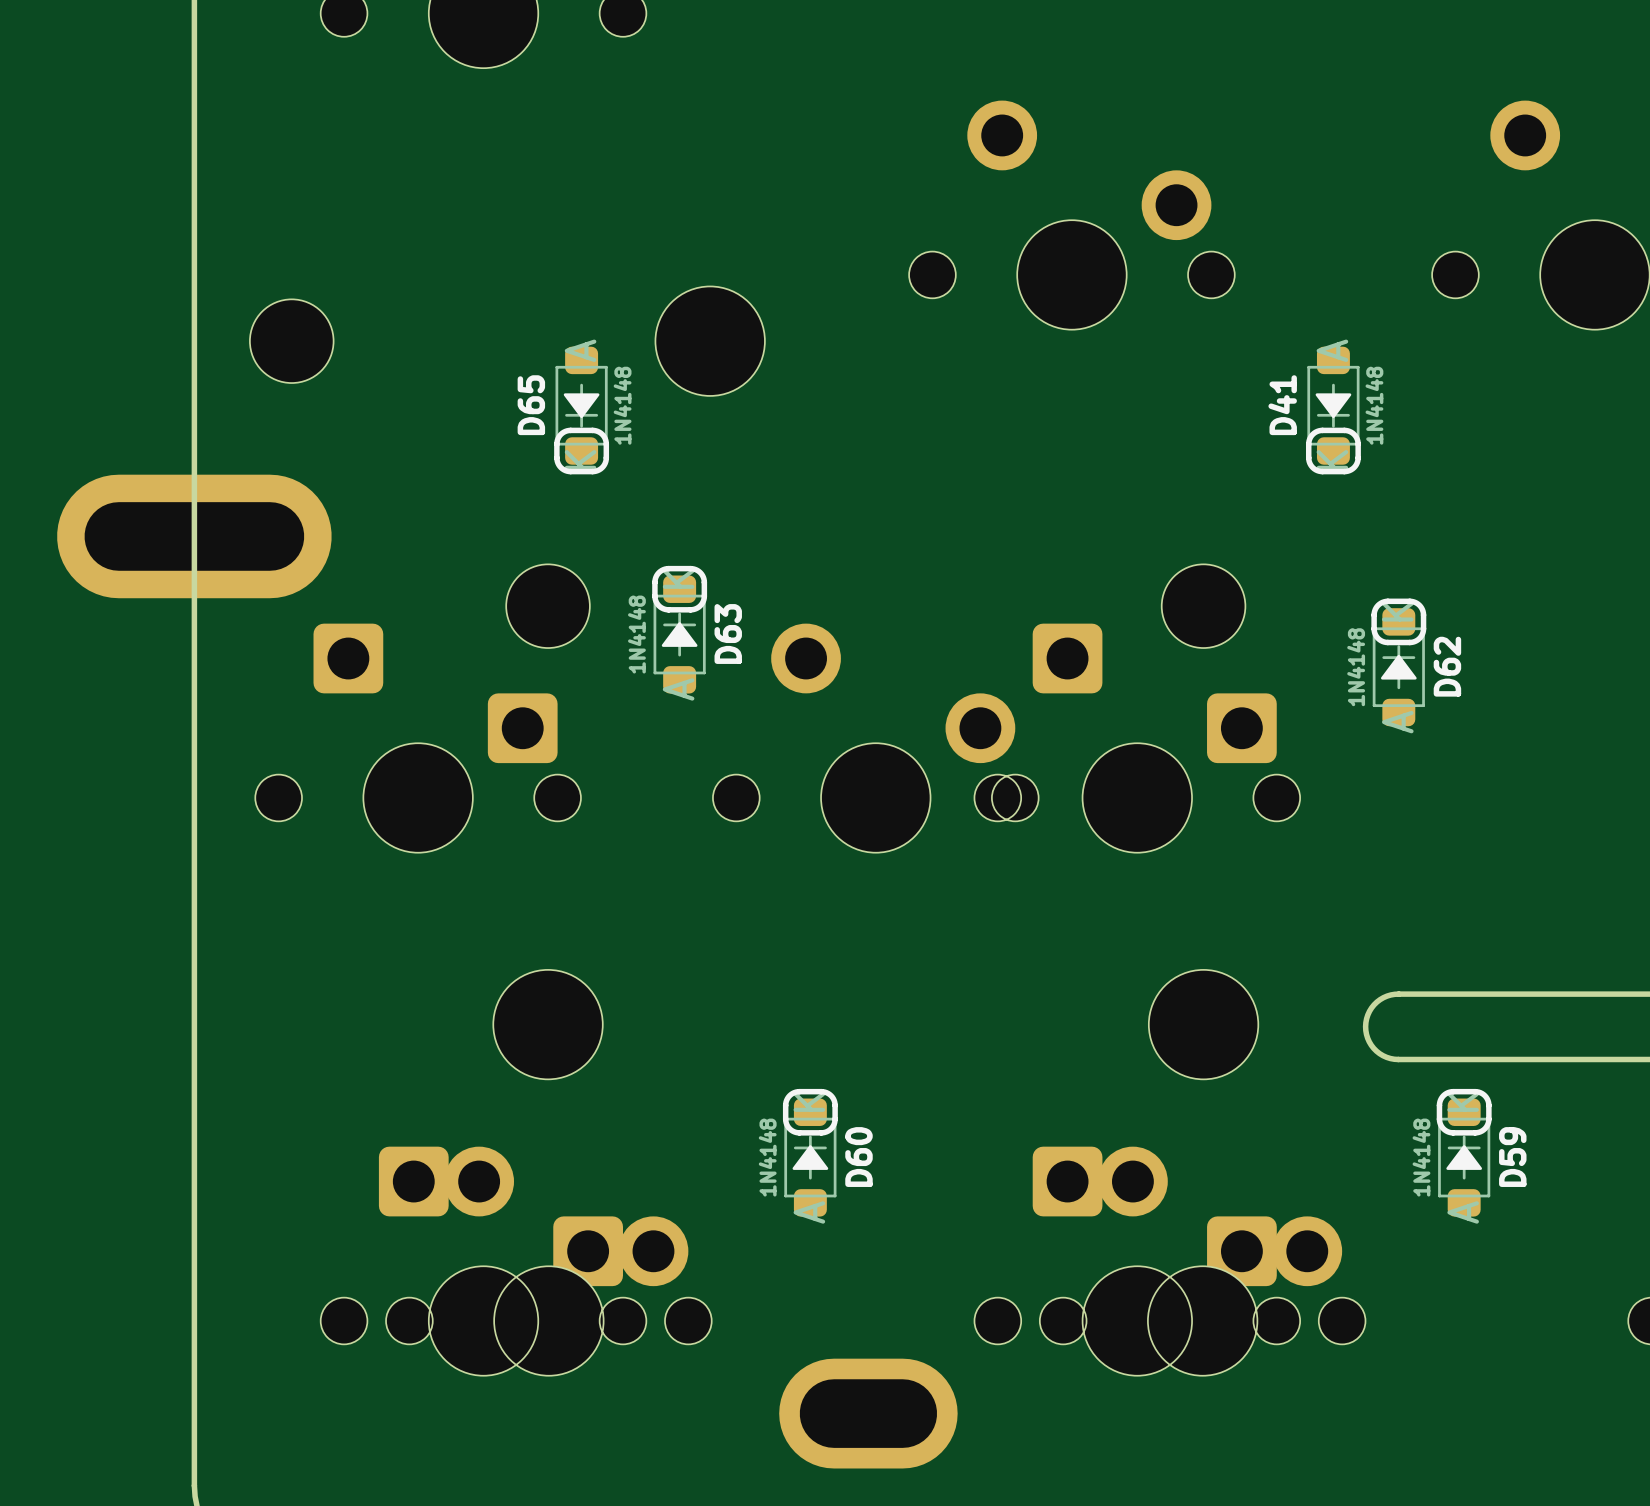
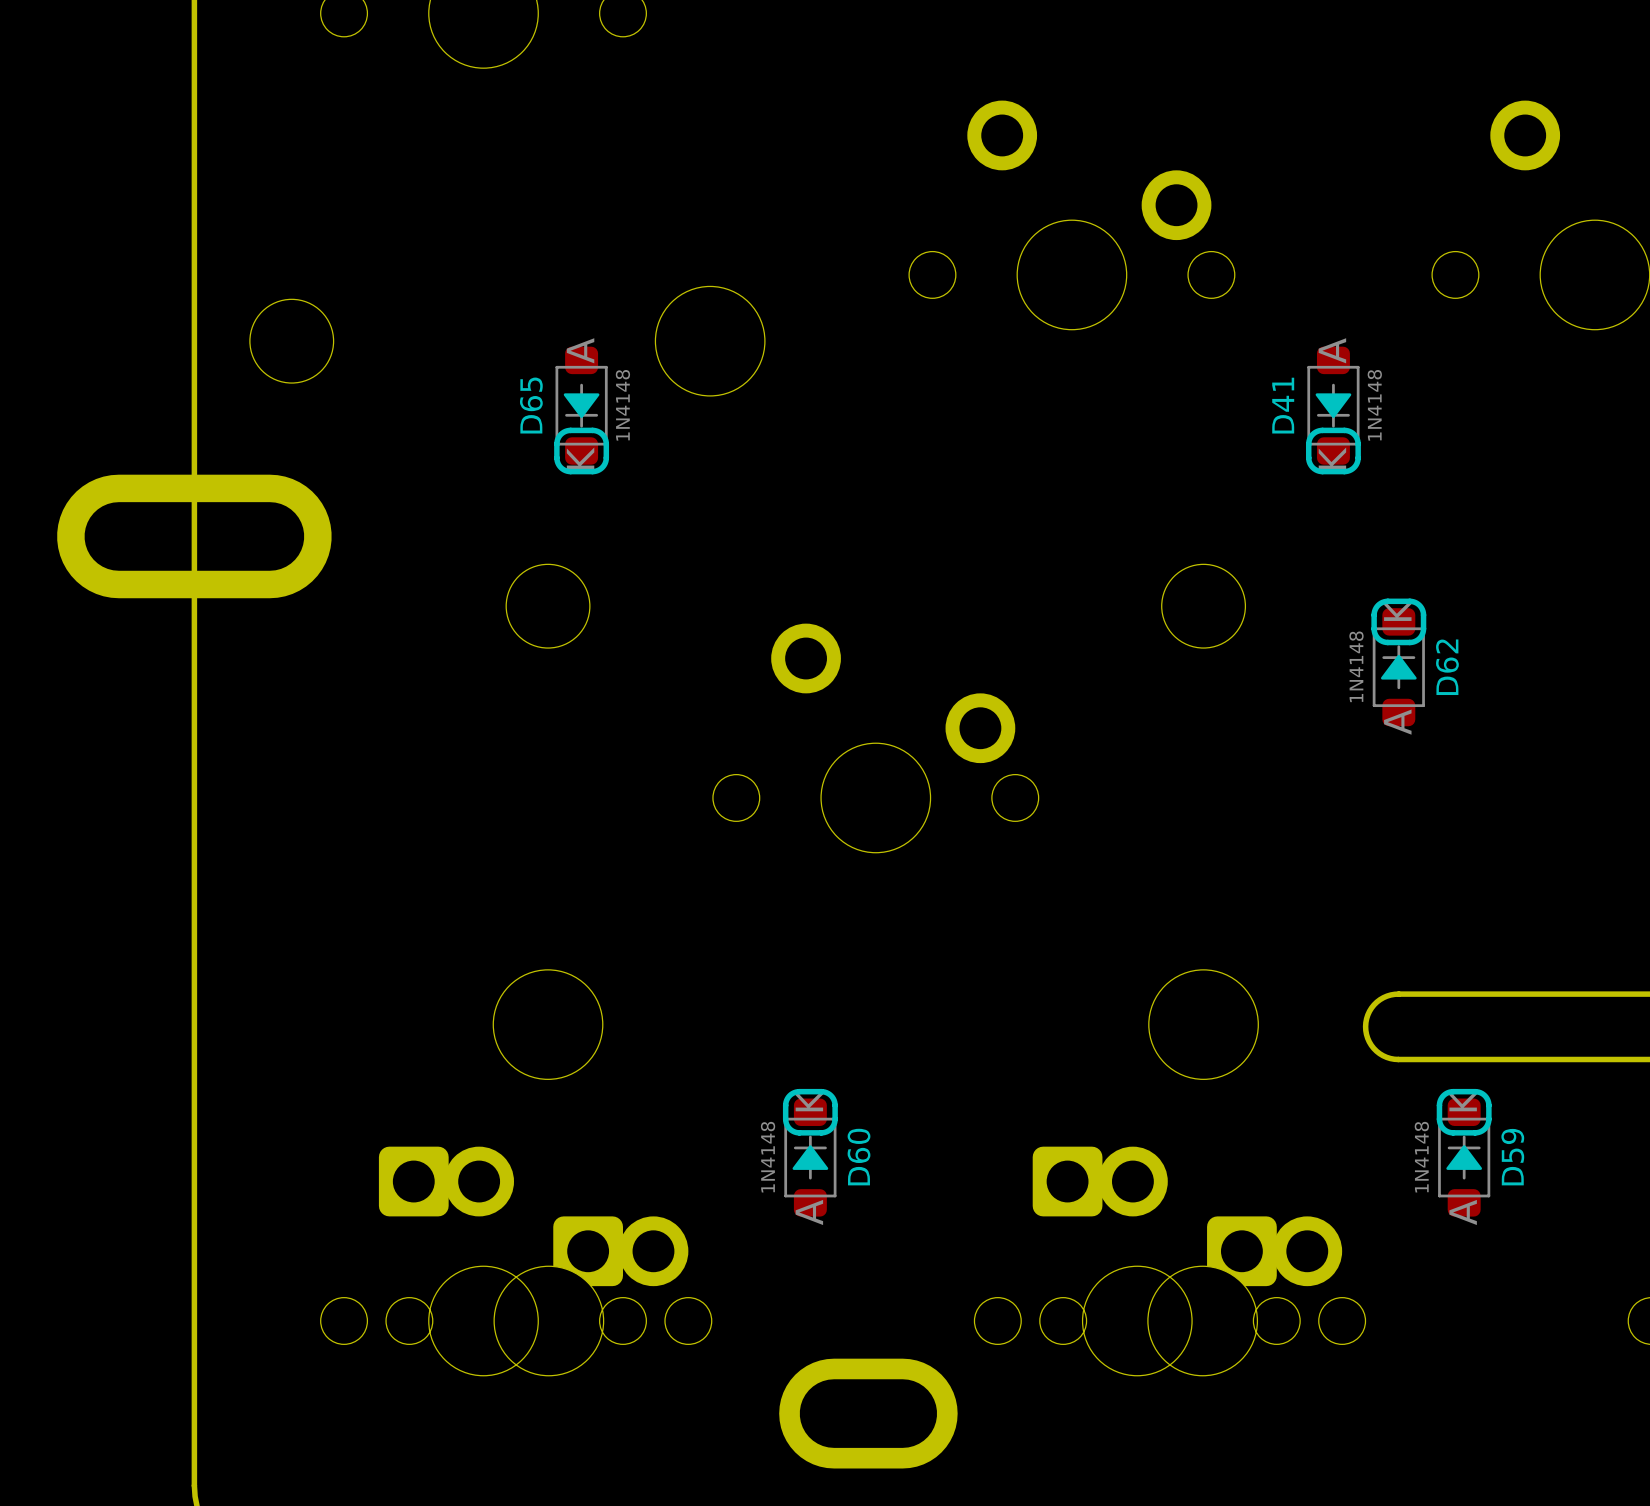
D63: 1N4148 (679, 629) -> none
part: (418, 738) -> none
part: (1137, 738) -> none

